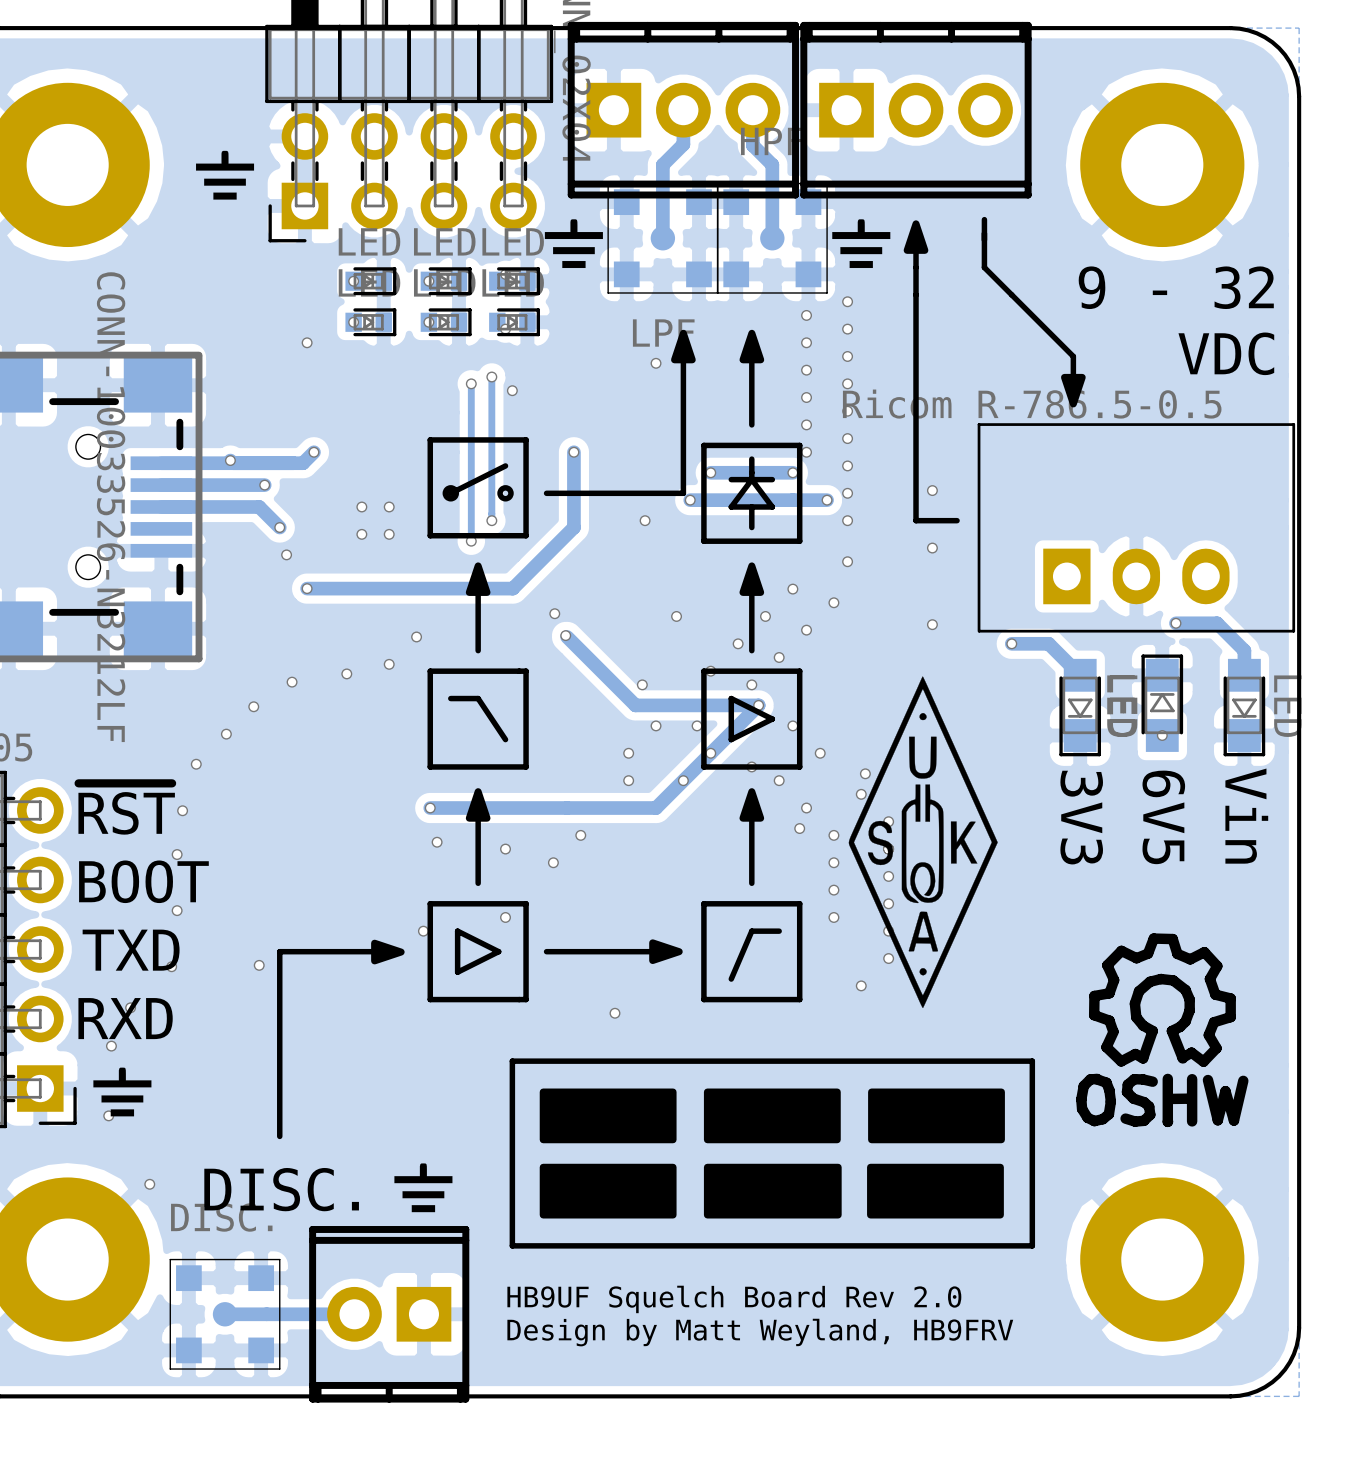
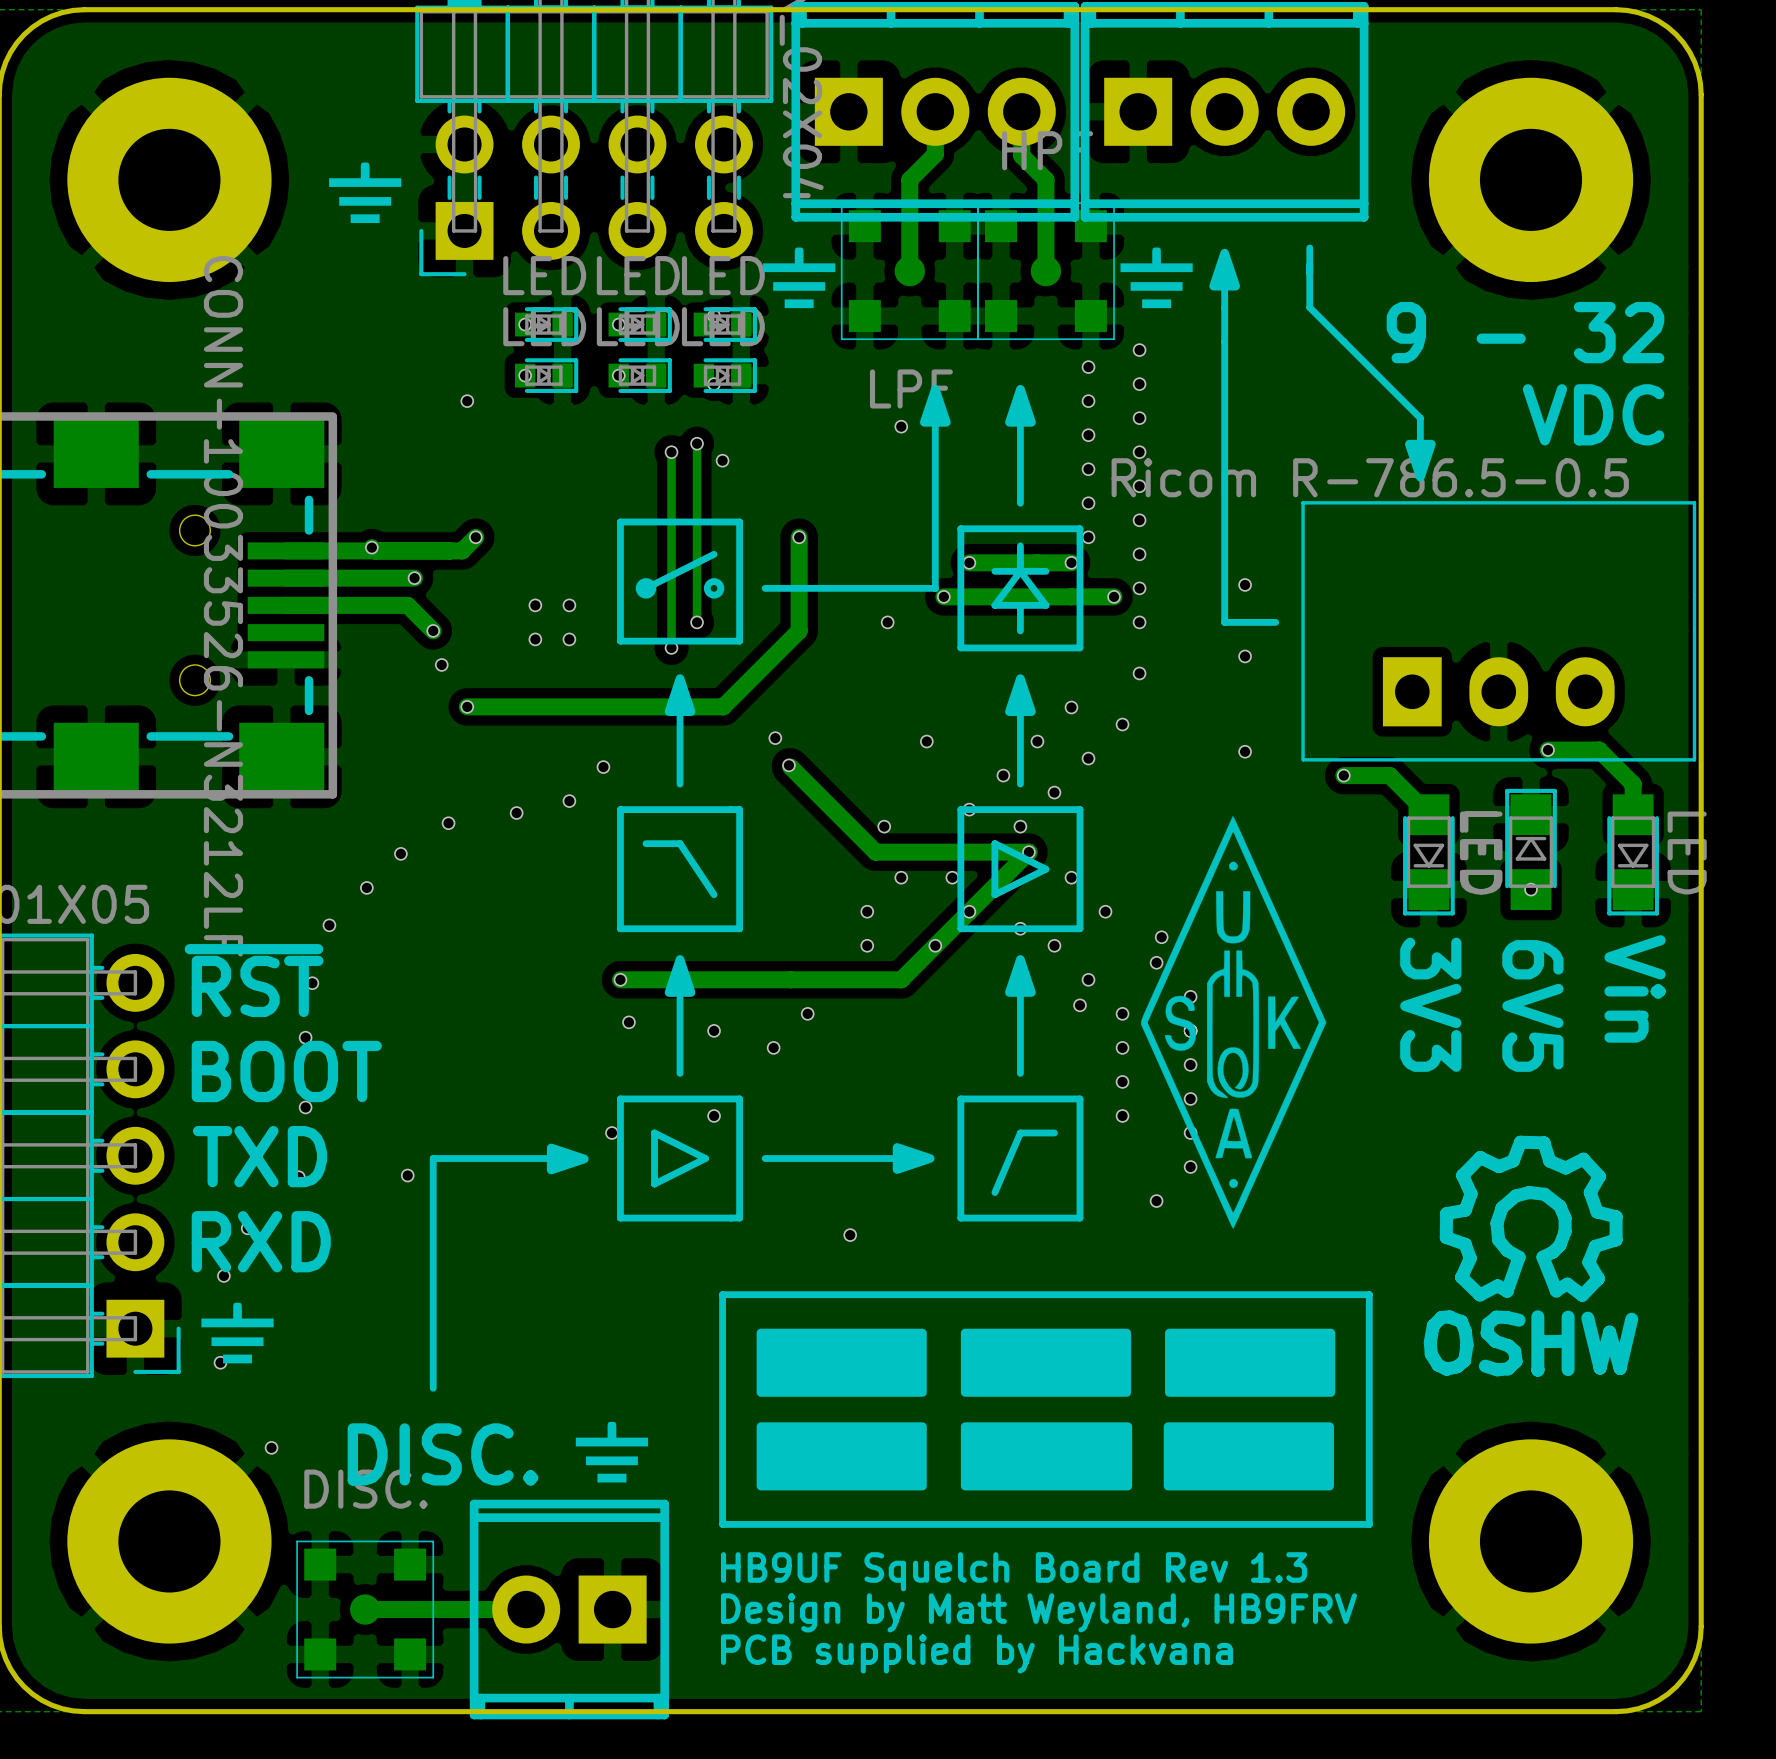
text: HB9UF Squelch Board Rev 2.0 (734, 1299) -> HB9UF Squelch Board Rev 1.3 (1014, 1571)
text position: Design by Matt Weyland, HB9FRV (760, 1332) -> Design by Matt Weyland, HB9FRV (1038, 1612)
text: none -> PCB supplied by Hackvana (976, 1653)

